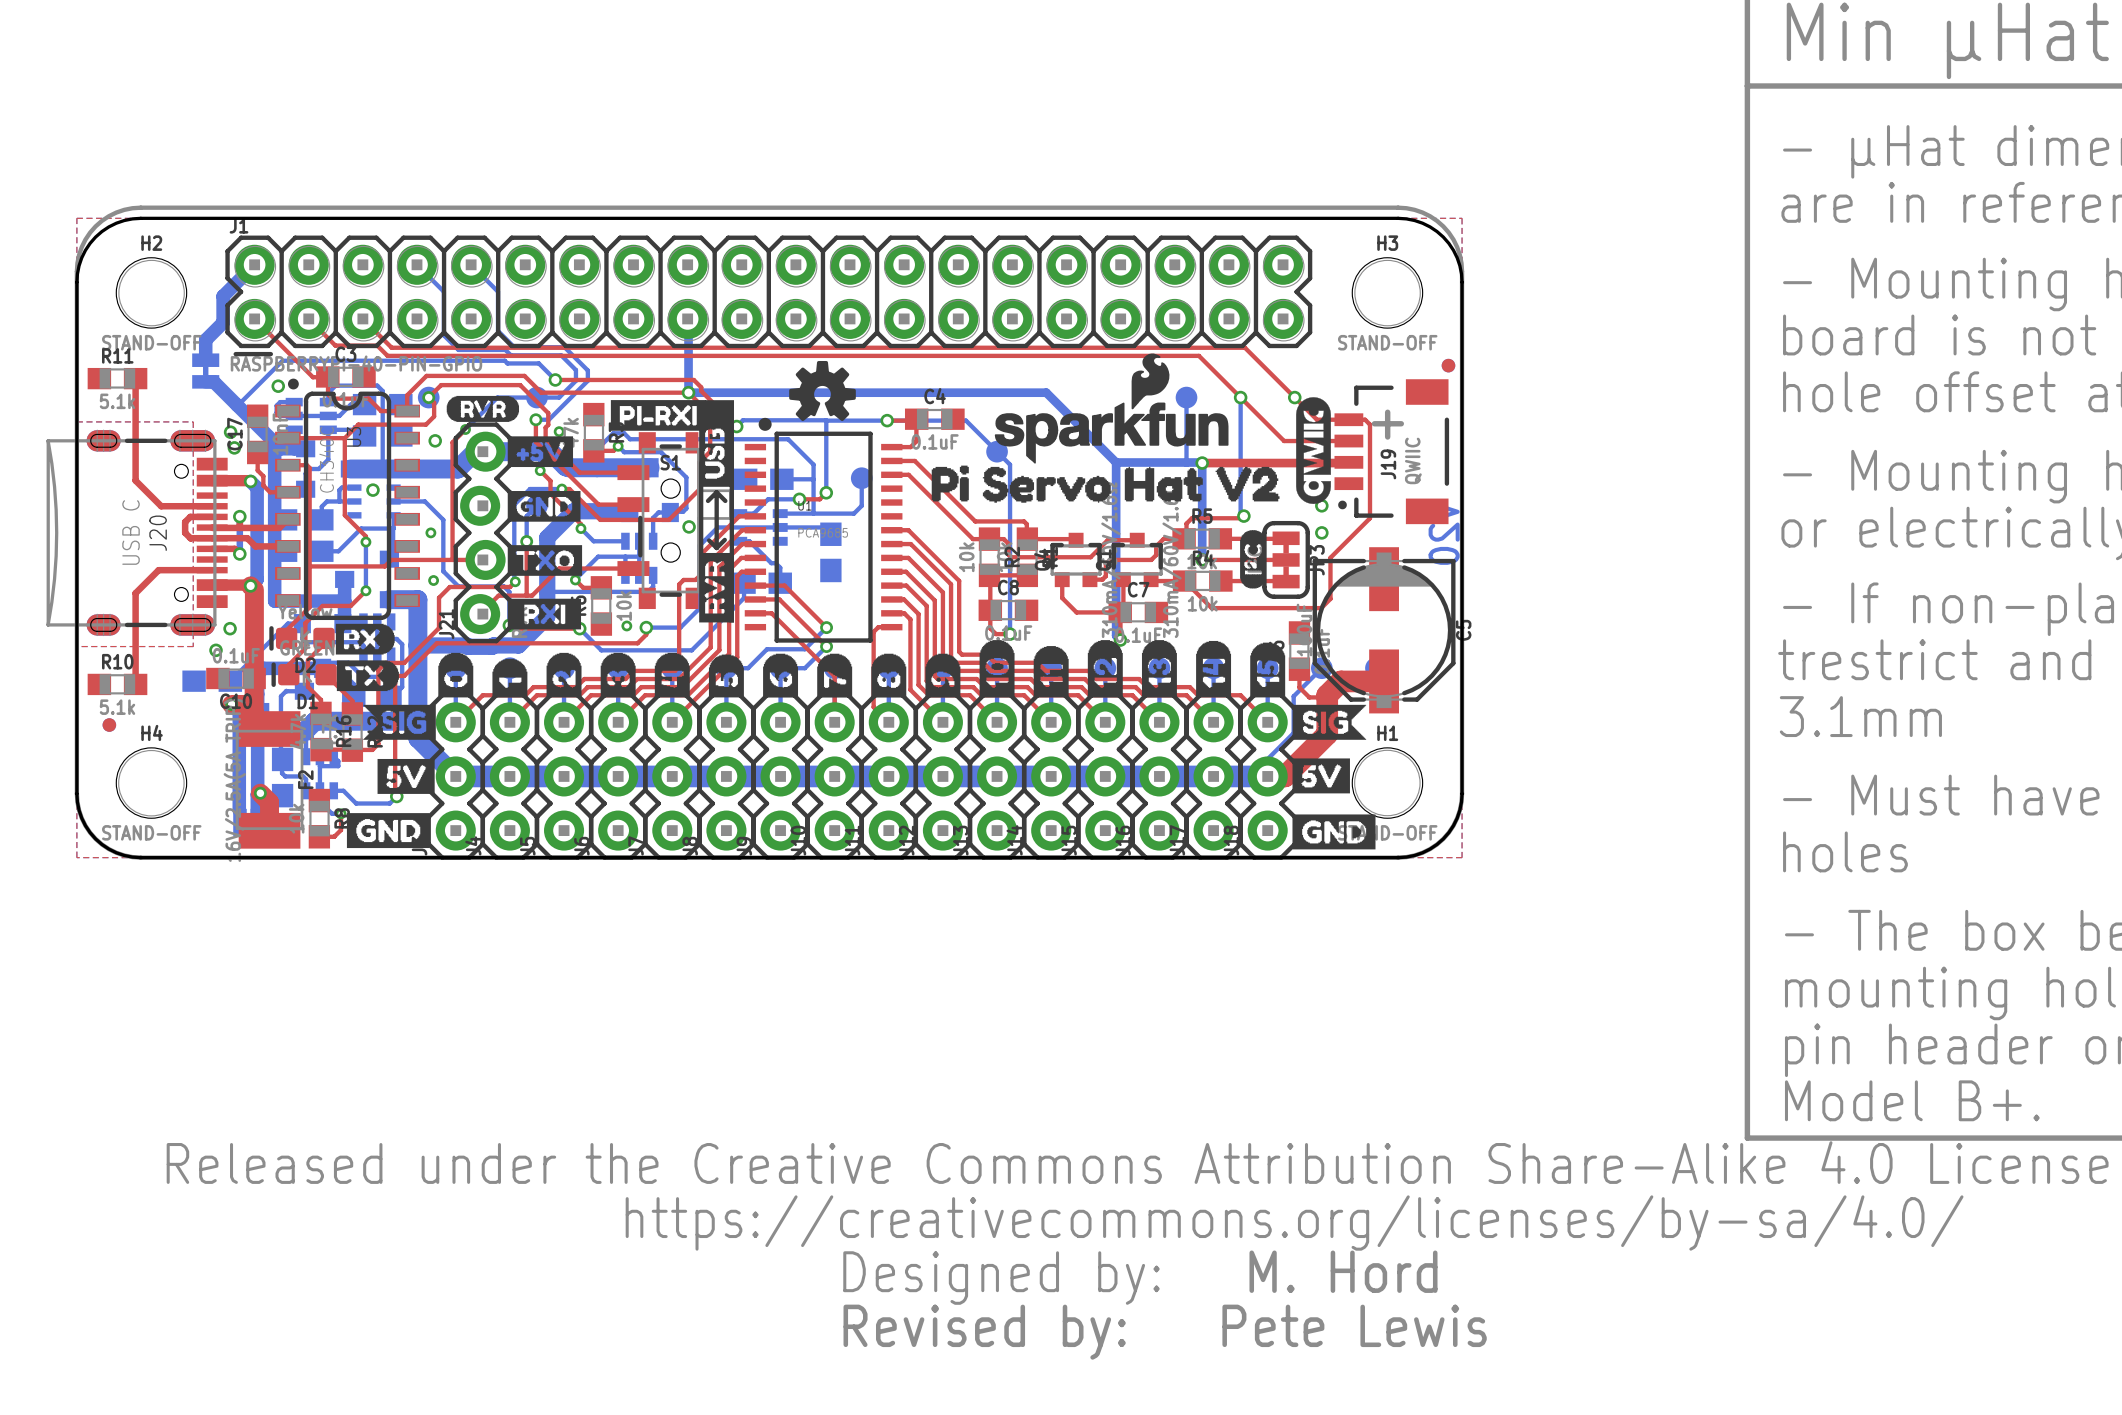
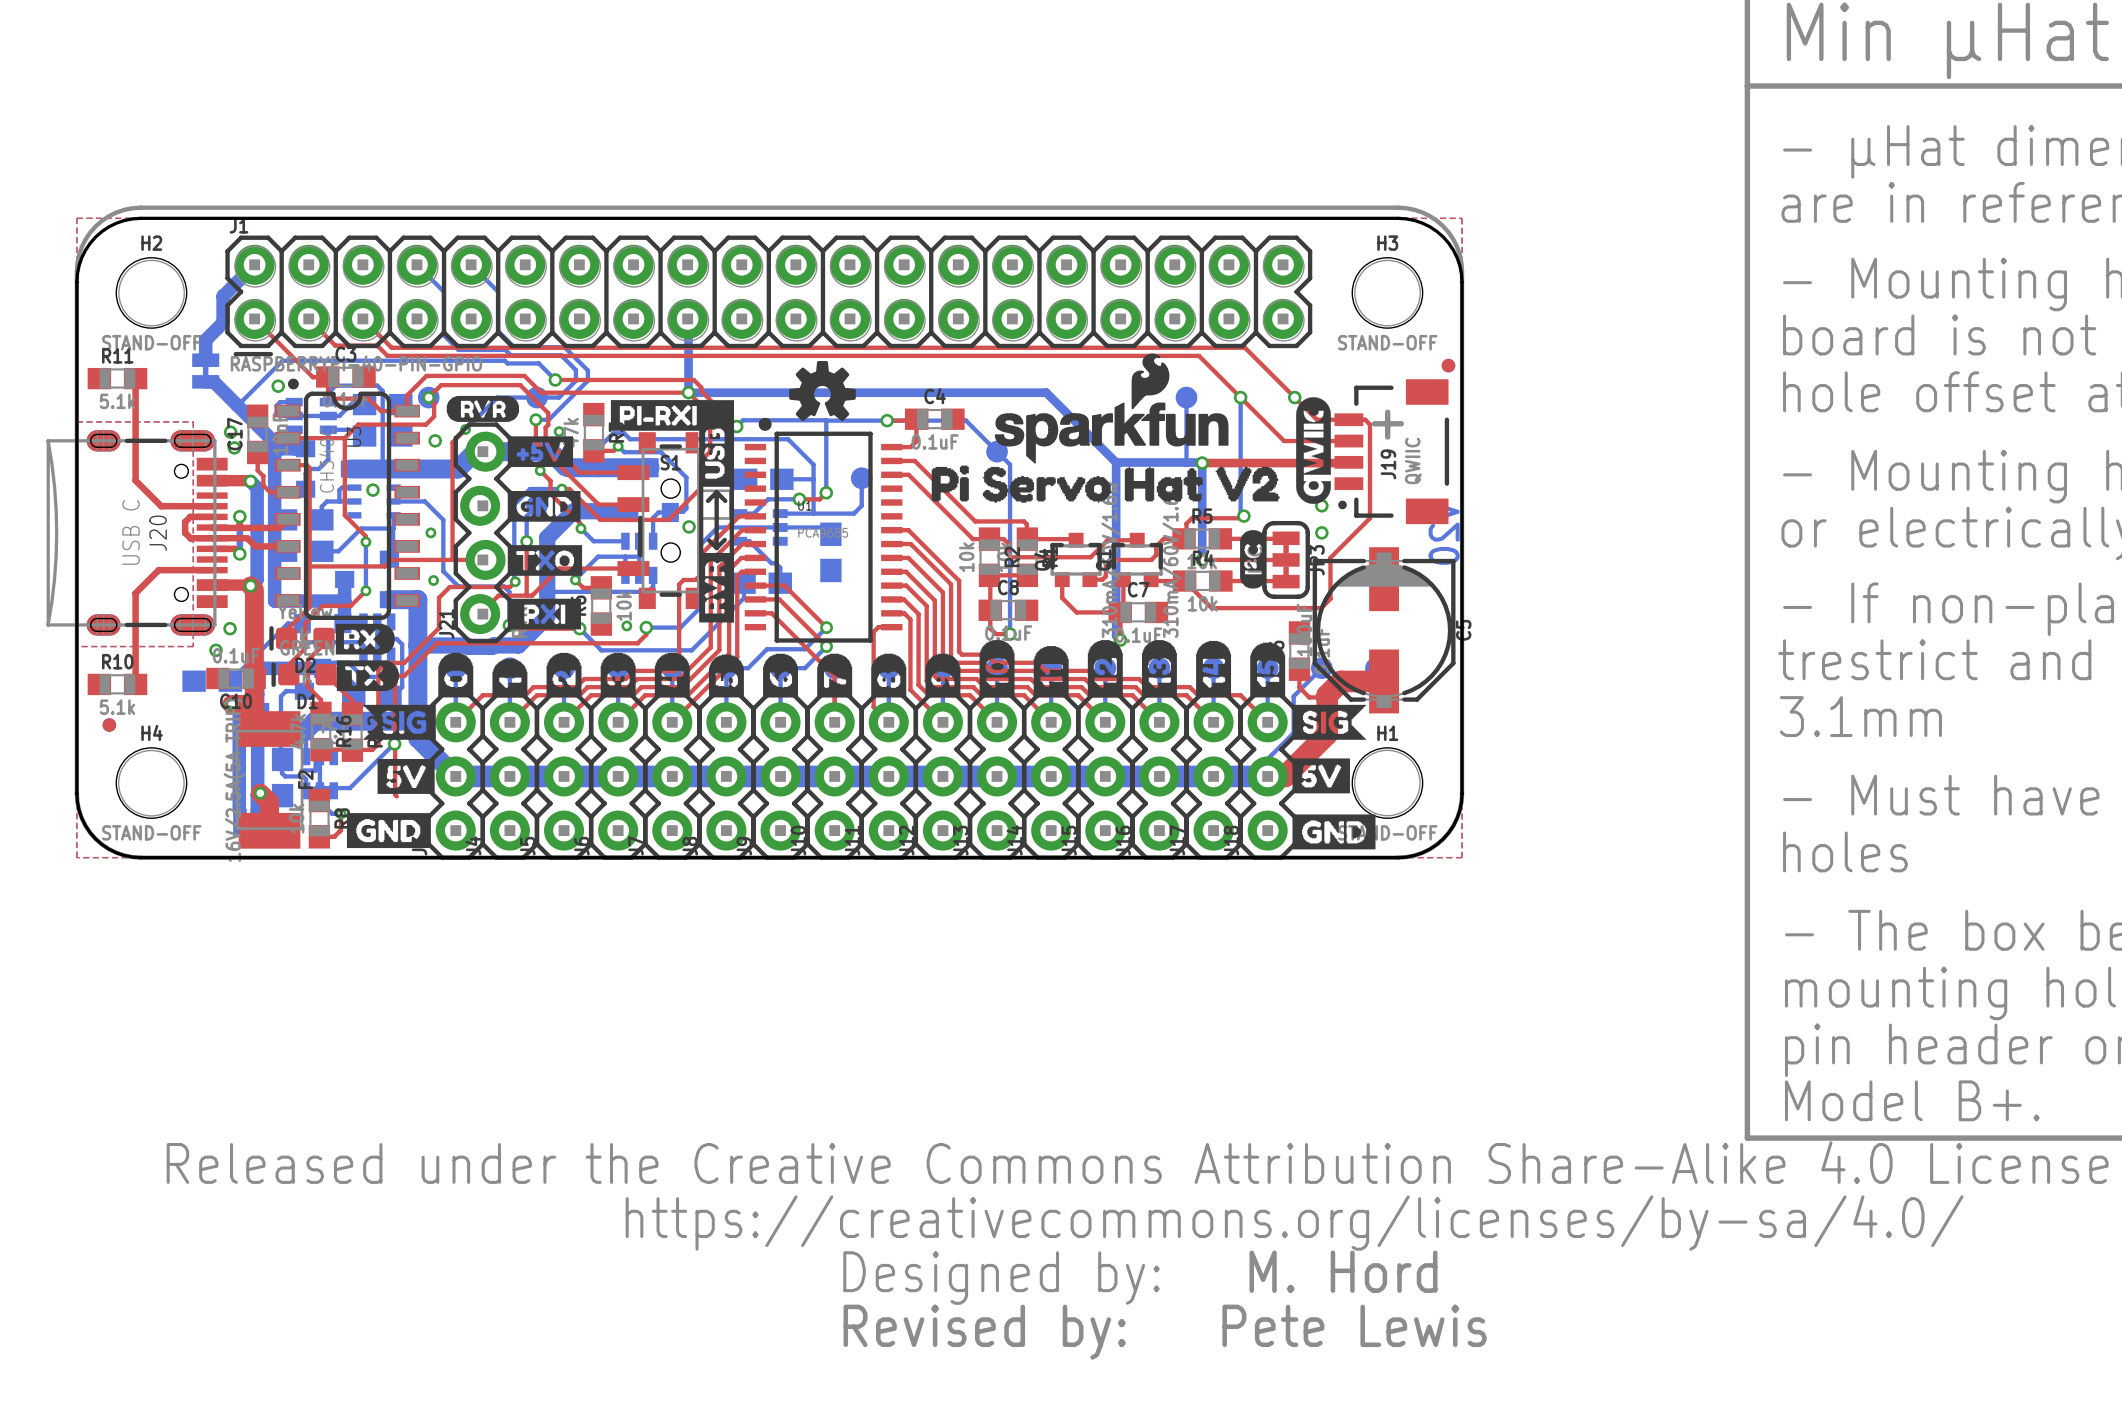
bottom track: none -> (394, 743) (349, 788) (315, 788)
bottom track: none -> (315, 754) (315, 770) (301, 770)
bottom track: (333, 756) (338, 761) (338, 766) (319, 766) -> none
bottom track: (333, 790) (343, 790) (356, 803) (389, 803) (396, 796) -> none
via position: (396, 796) -> (394, 743)

